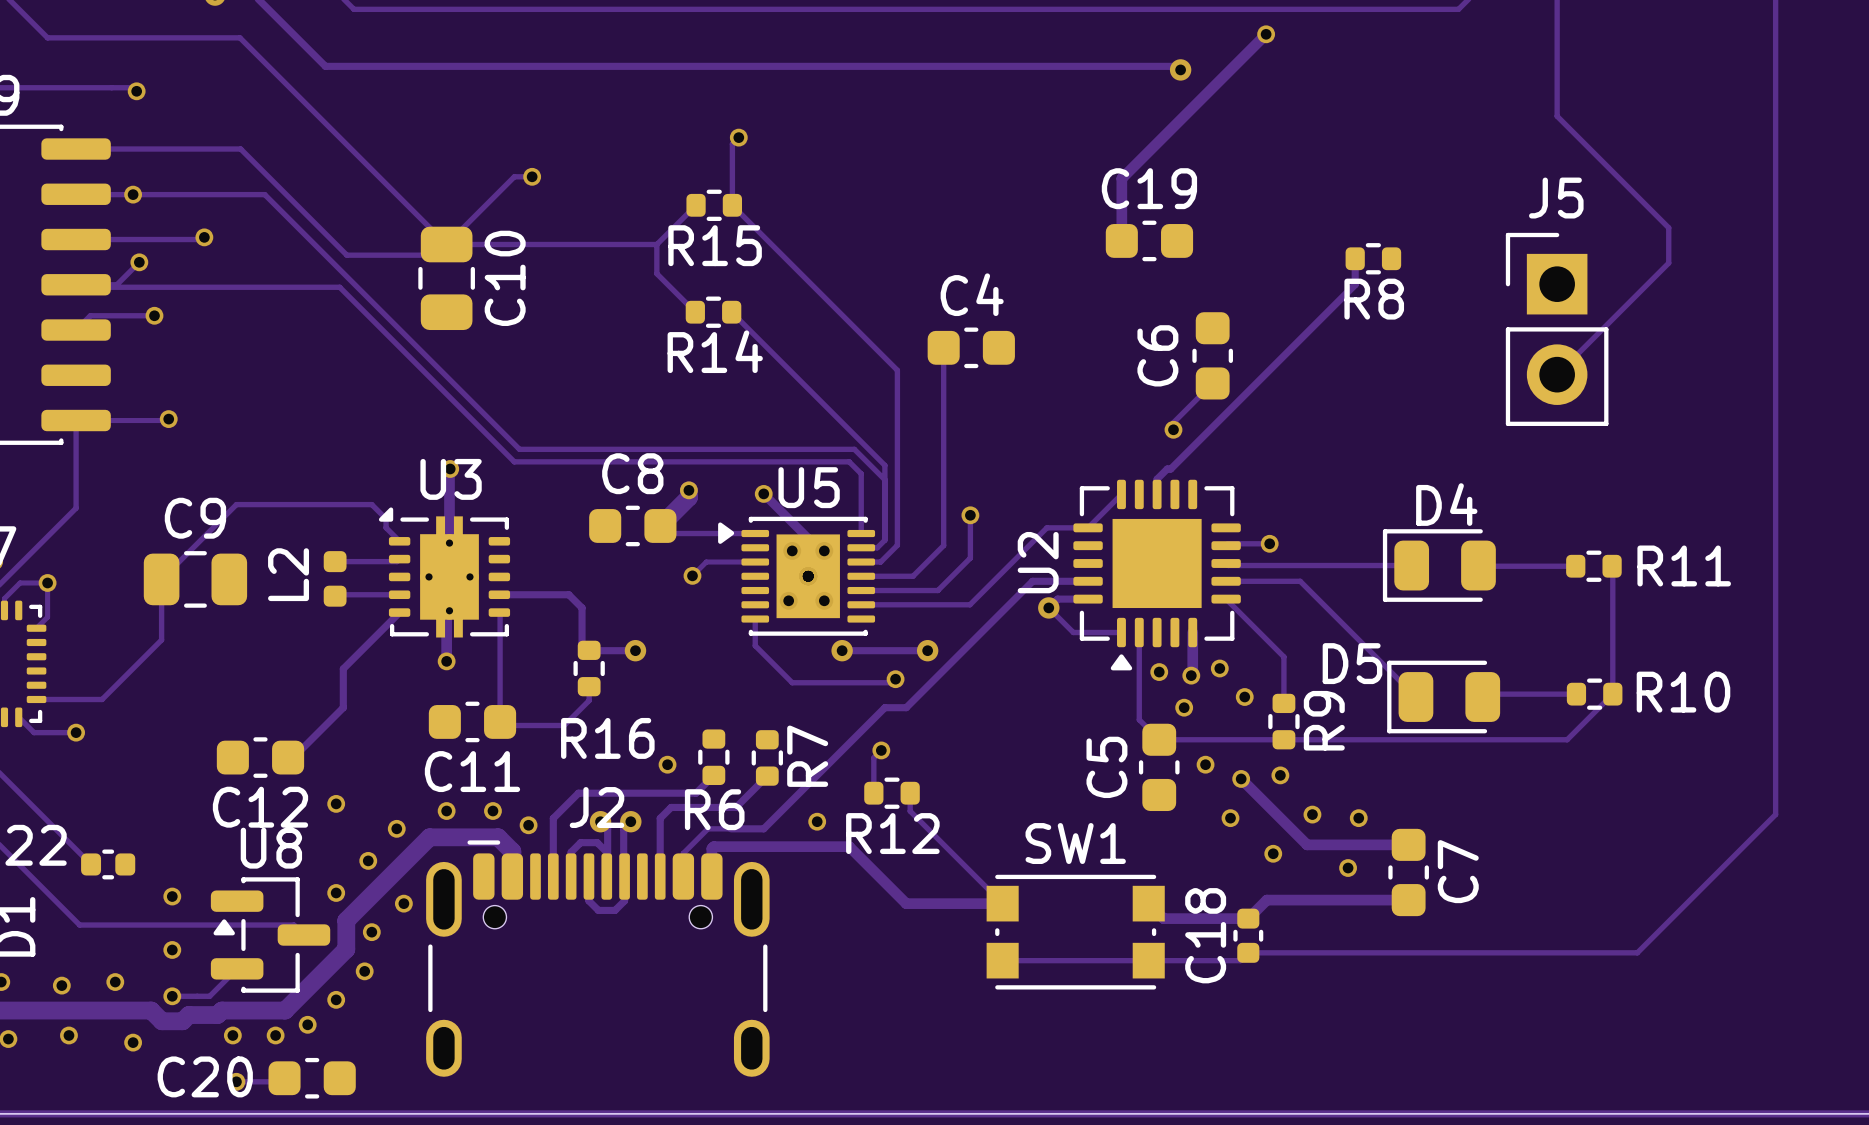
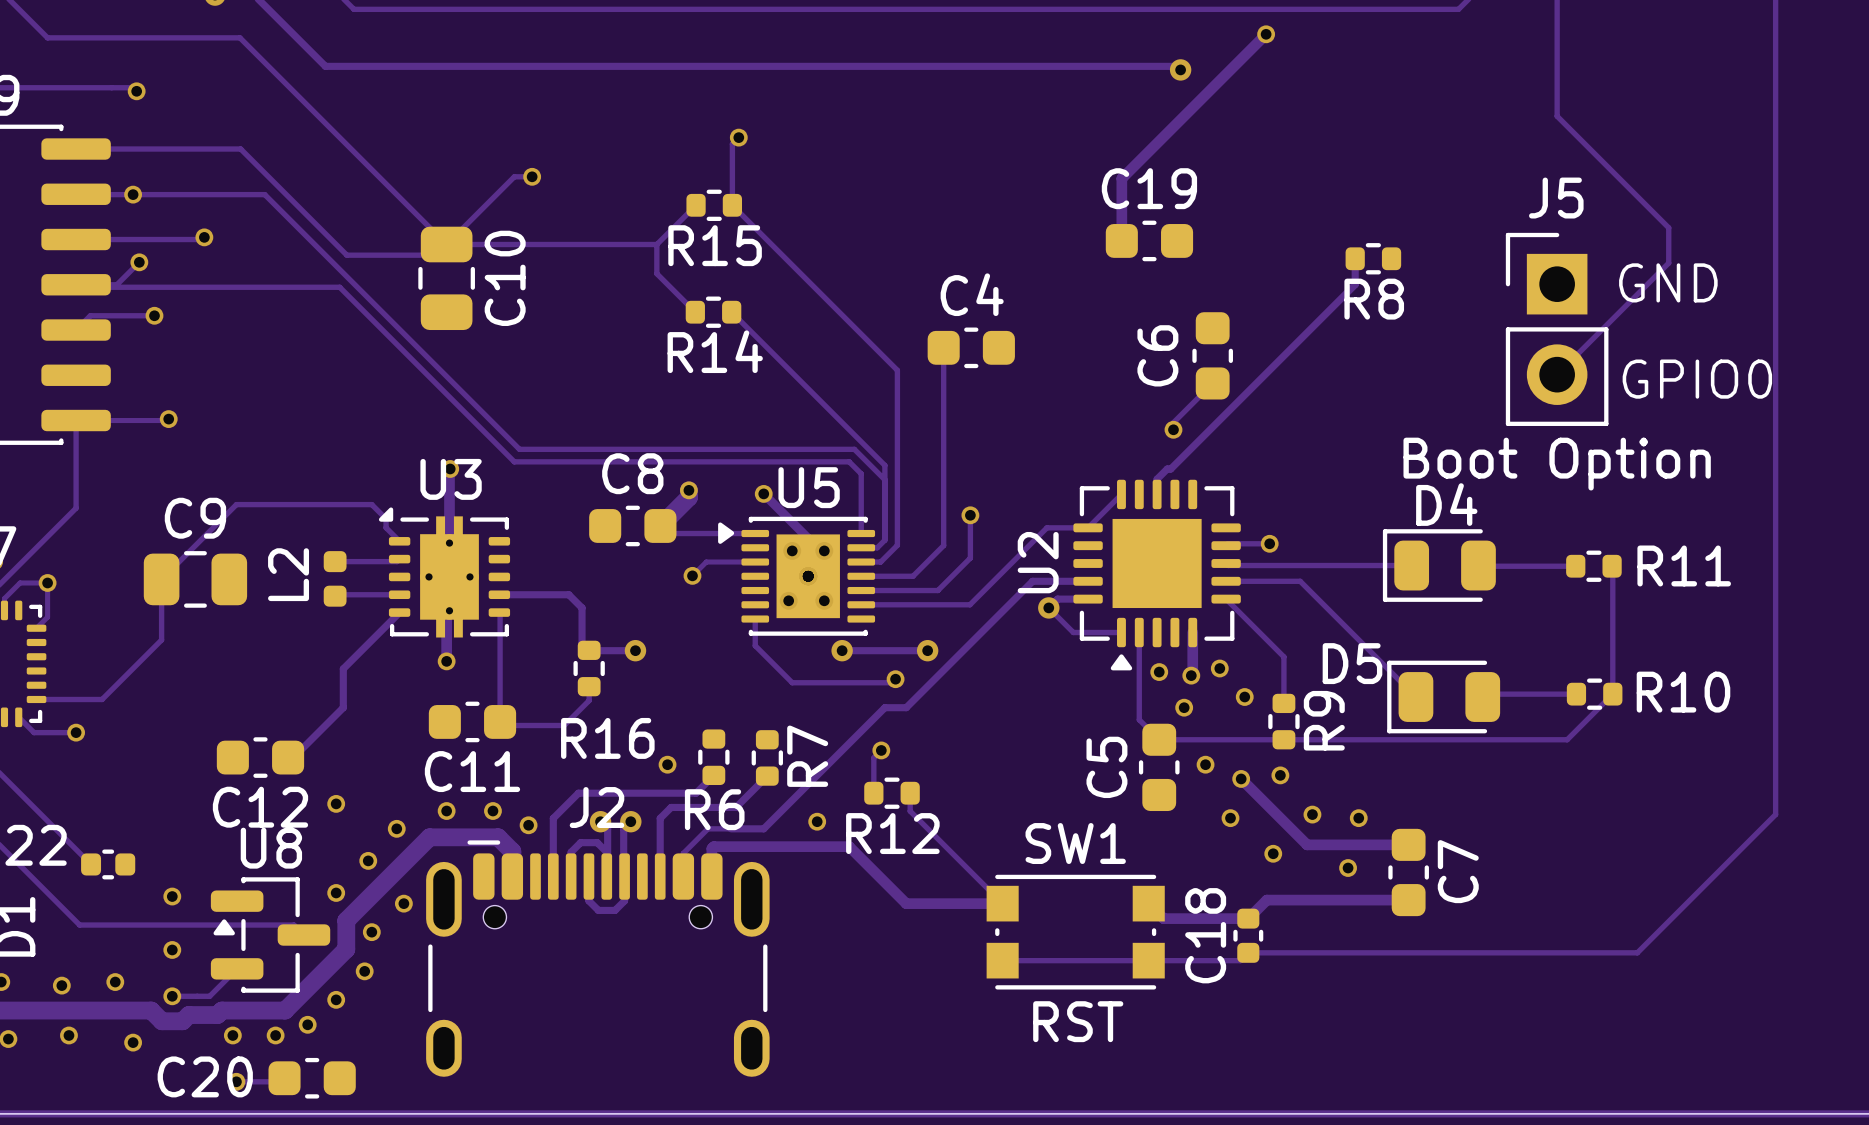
text: none -> GND (1668, 282)
text: none -> GPIO0 (1697, 379)
J5 value: none -> Boot Option (1557, 464)
SW1 value: none -> RST (1078, 1021)

